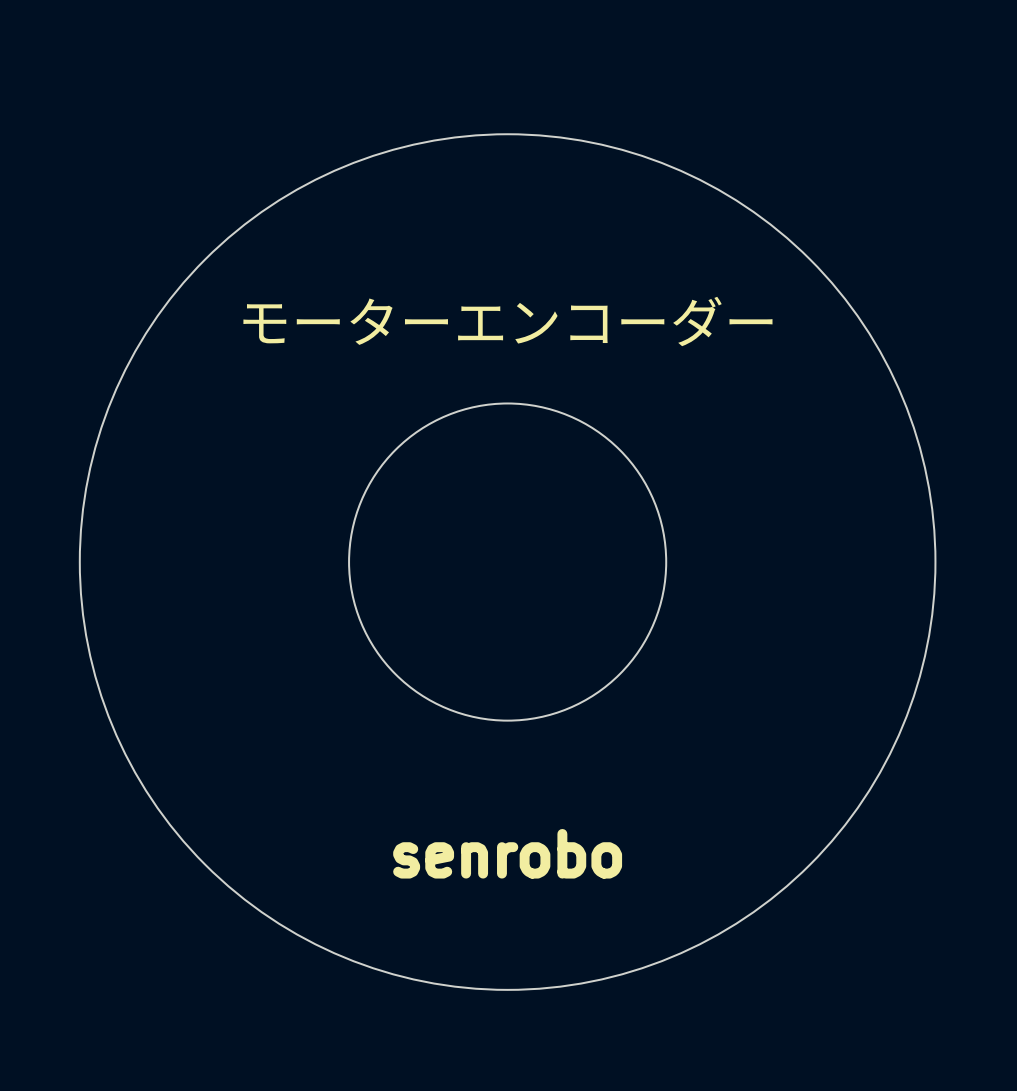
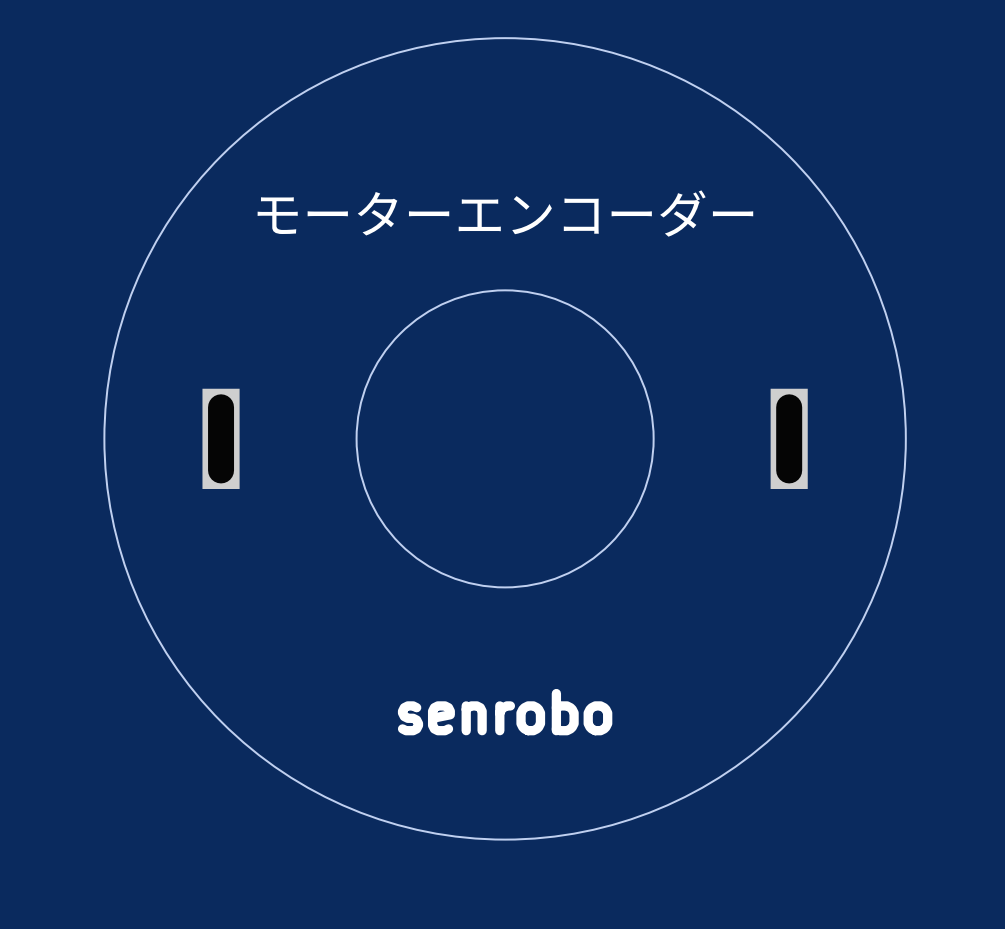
part: none -> (221, 438)
part: none -> (789, 438)

